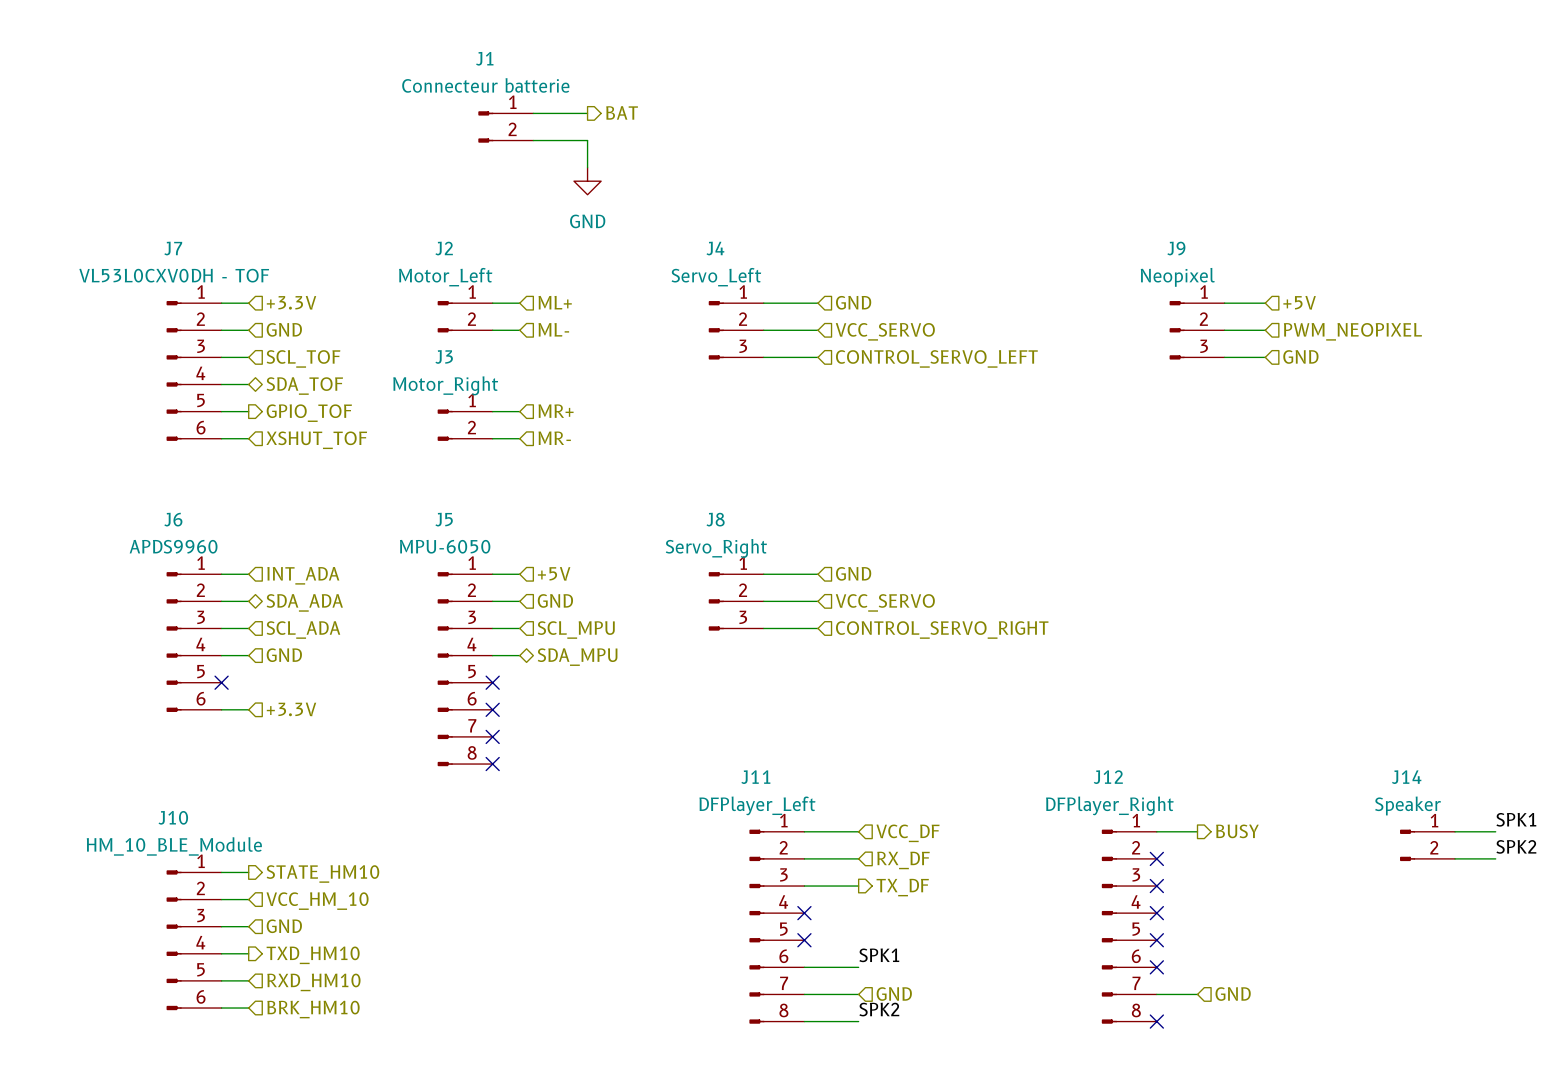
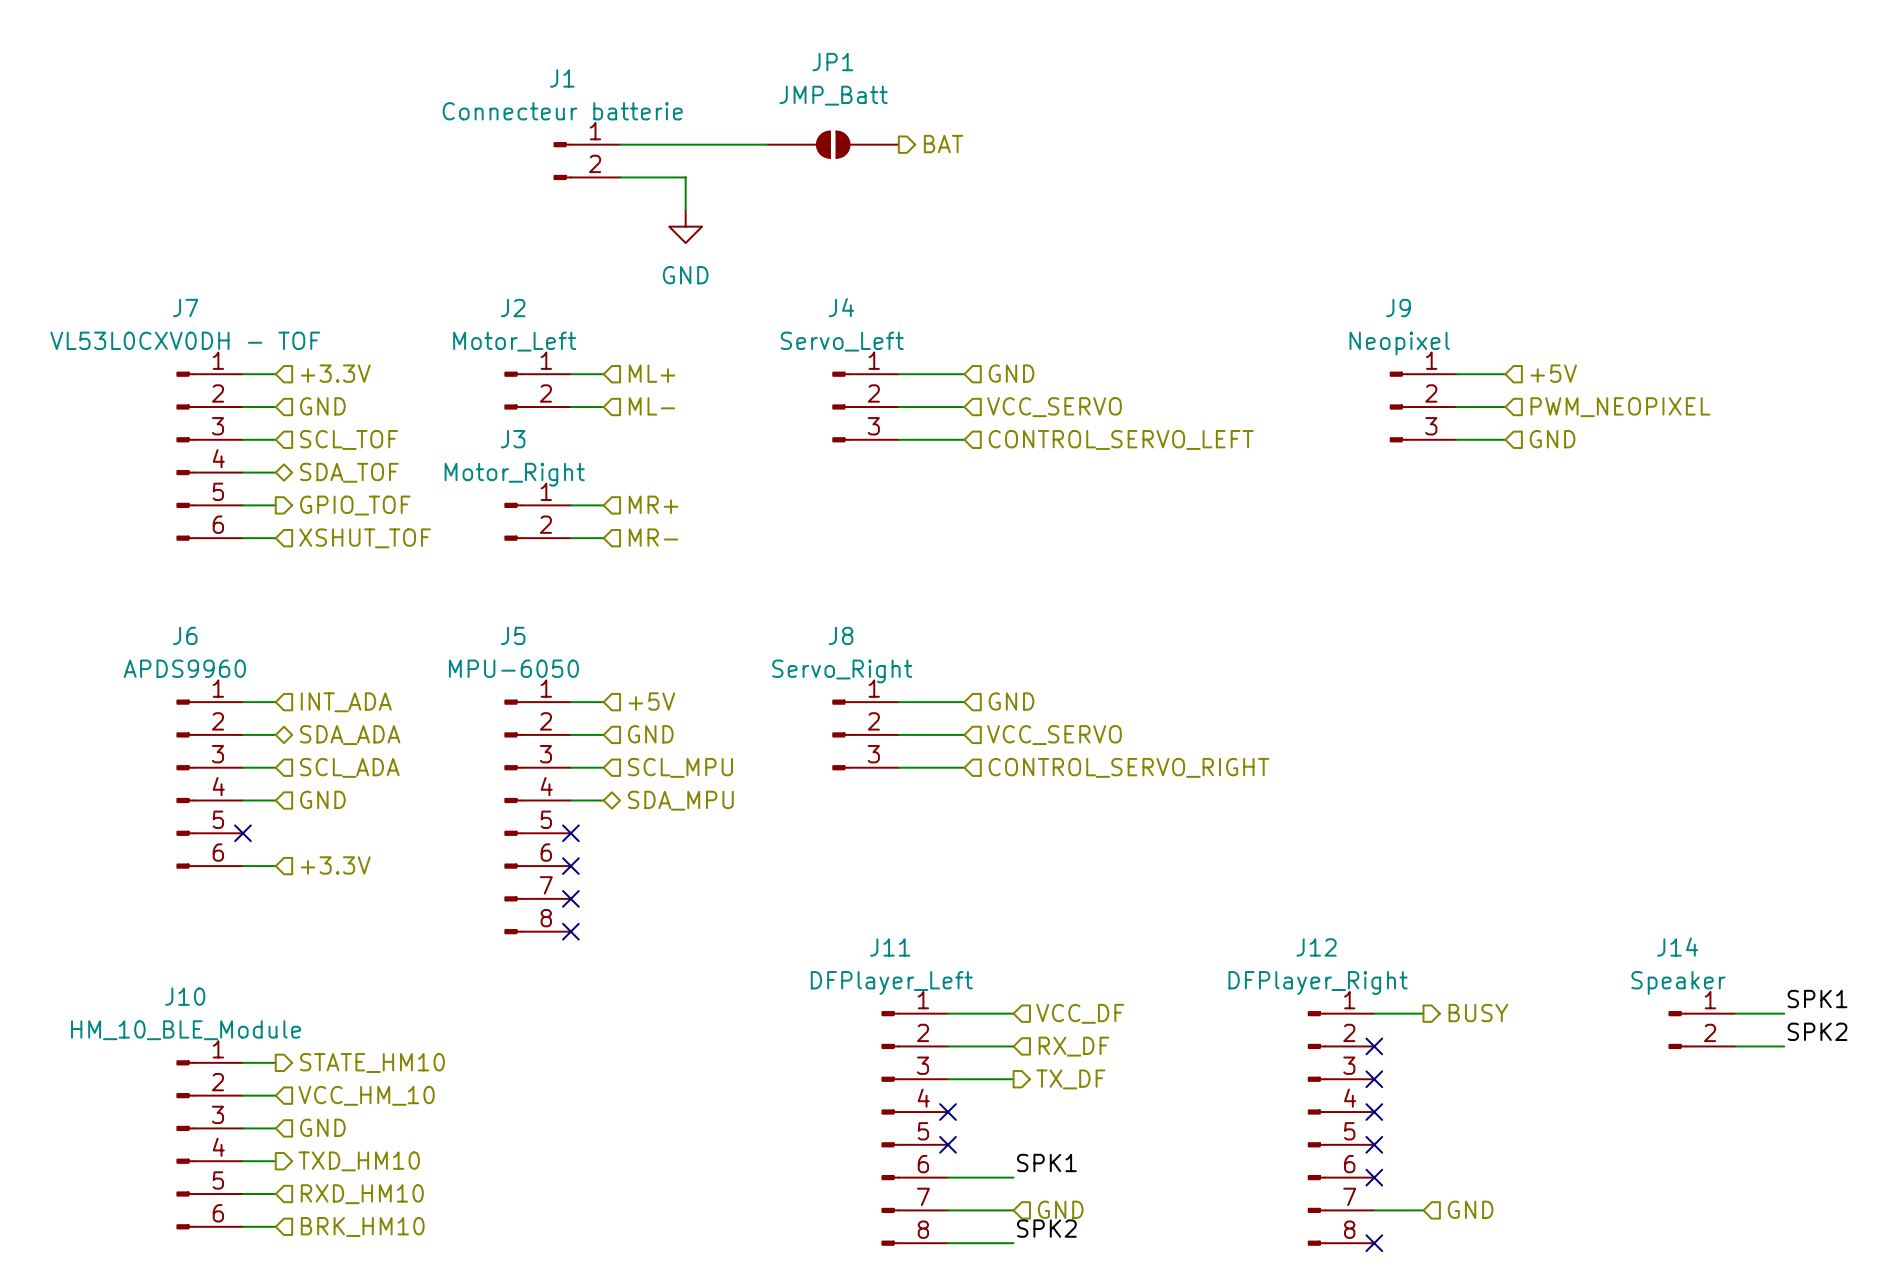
hierarchical label position: BAT (622, 112) -> BAT (943, 144)
wire: none -> (685, 144) (767, 144)
JP1: none -> JMP_Batt (833, 144)

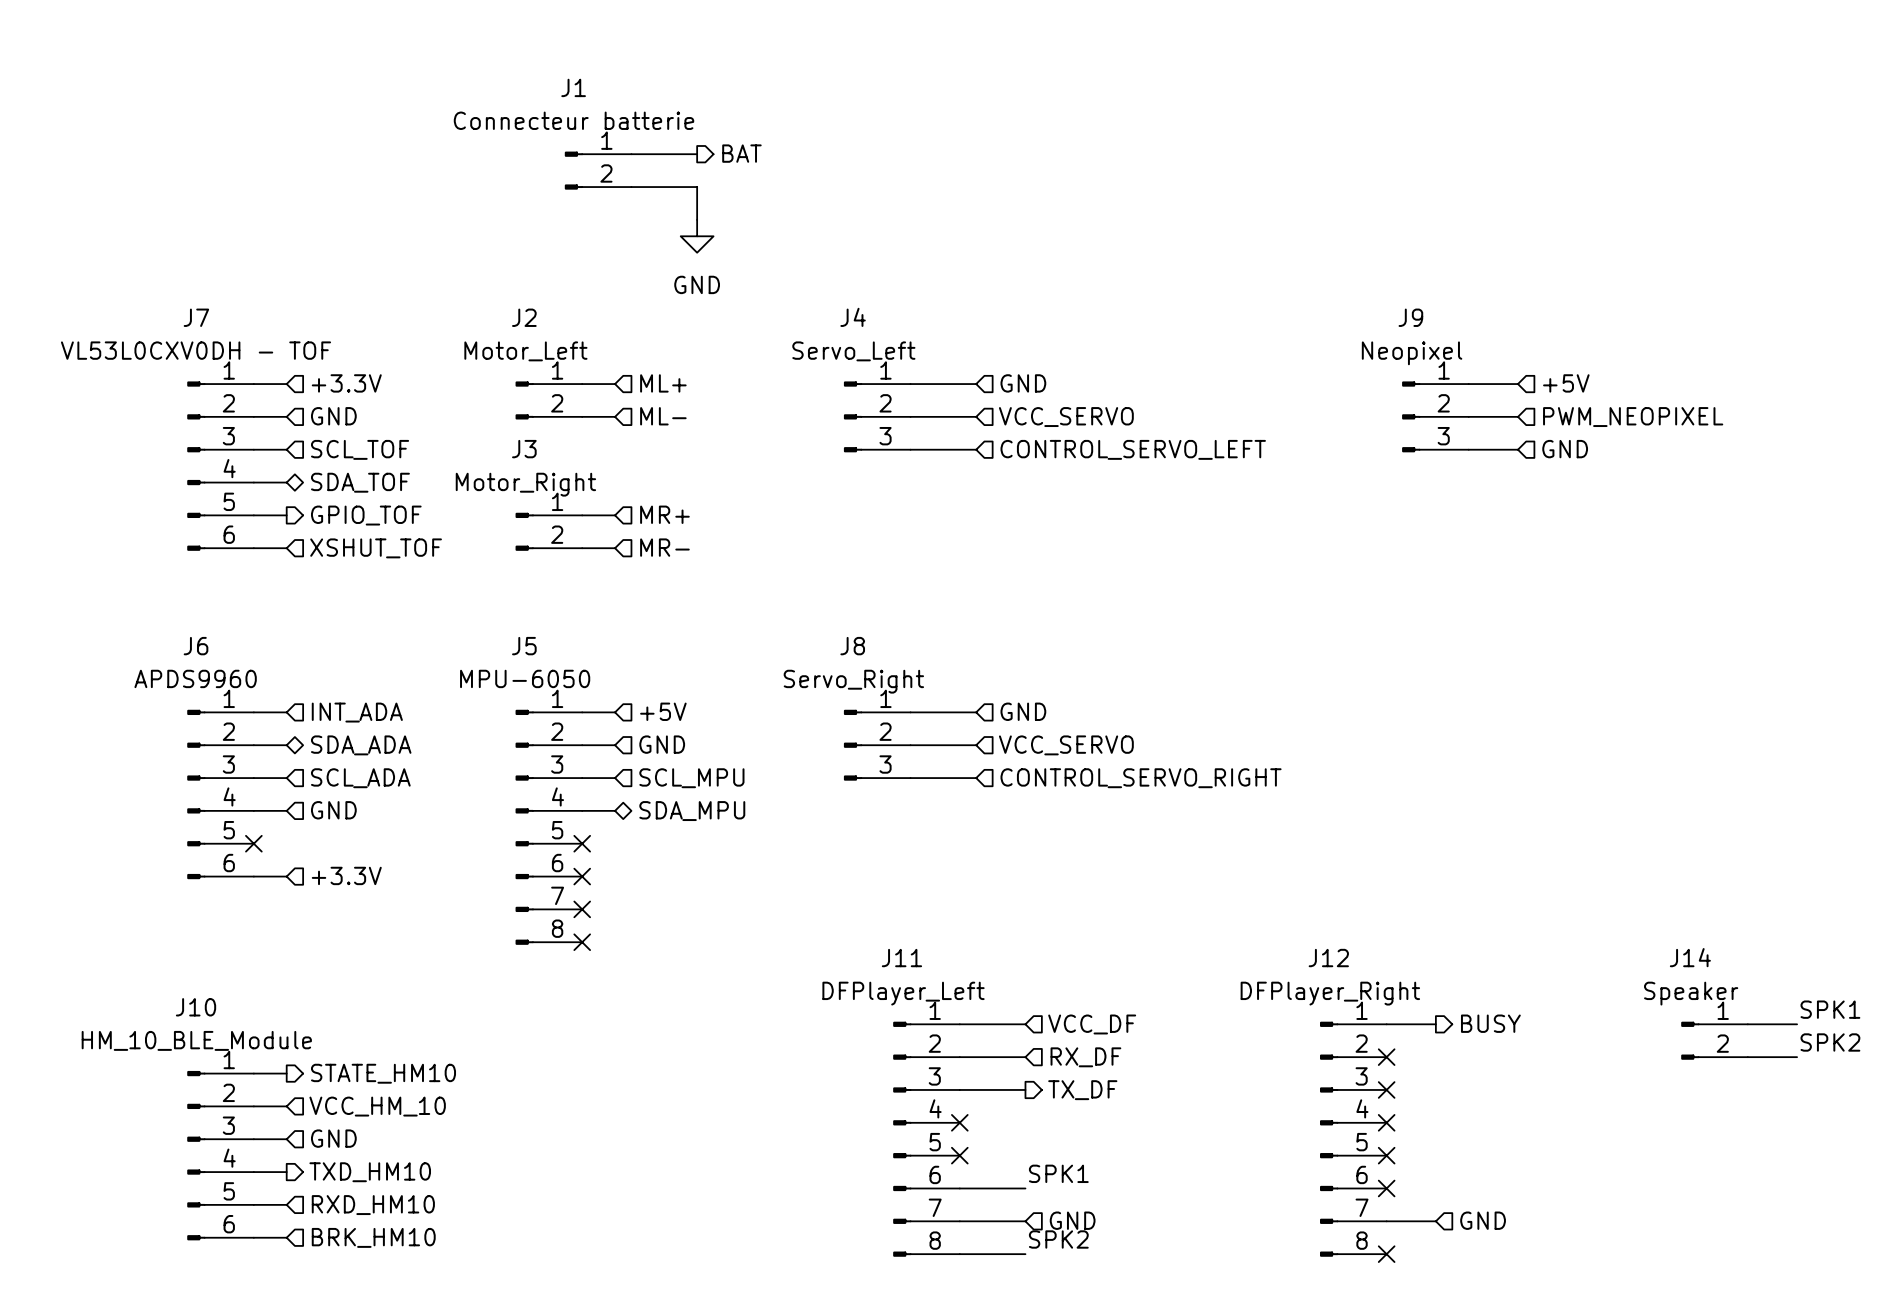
wire: (685, 144) (767, 144) -> none
JP1: JMP_Batt (833, 144) -> none
hierarchical label position: BAT (943, 144) -> BAT (741, 153)

